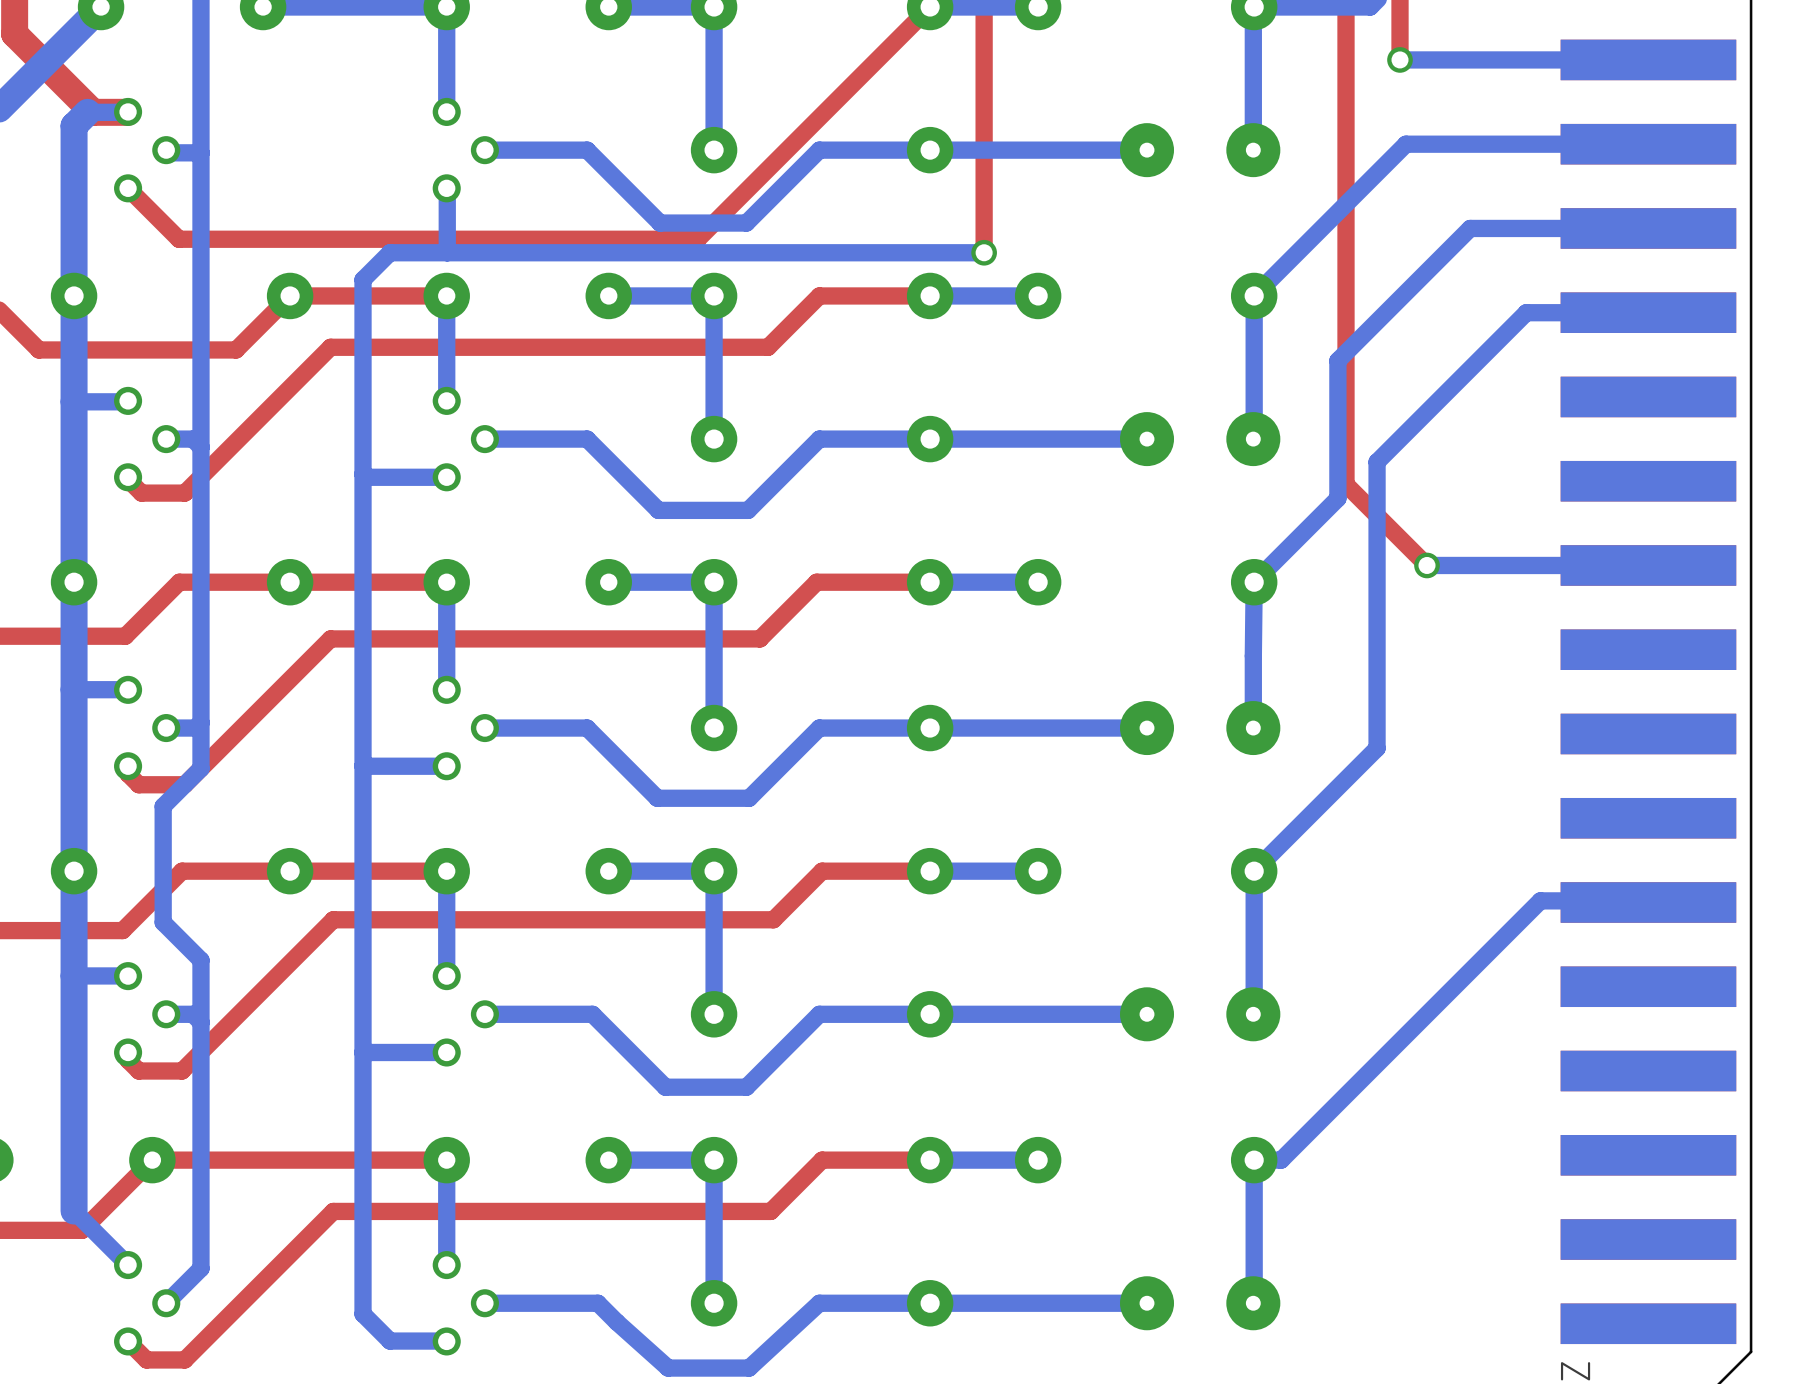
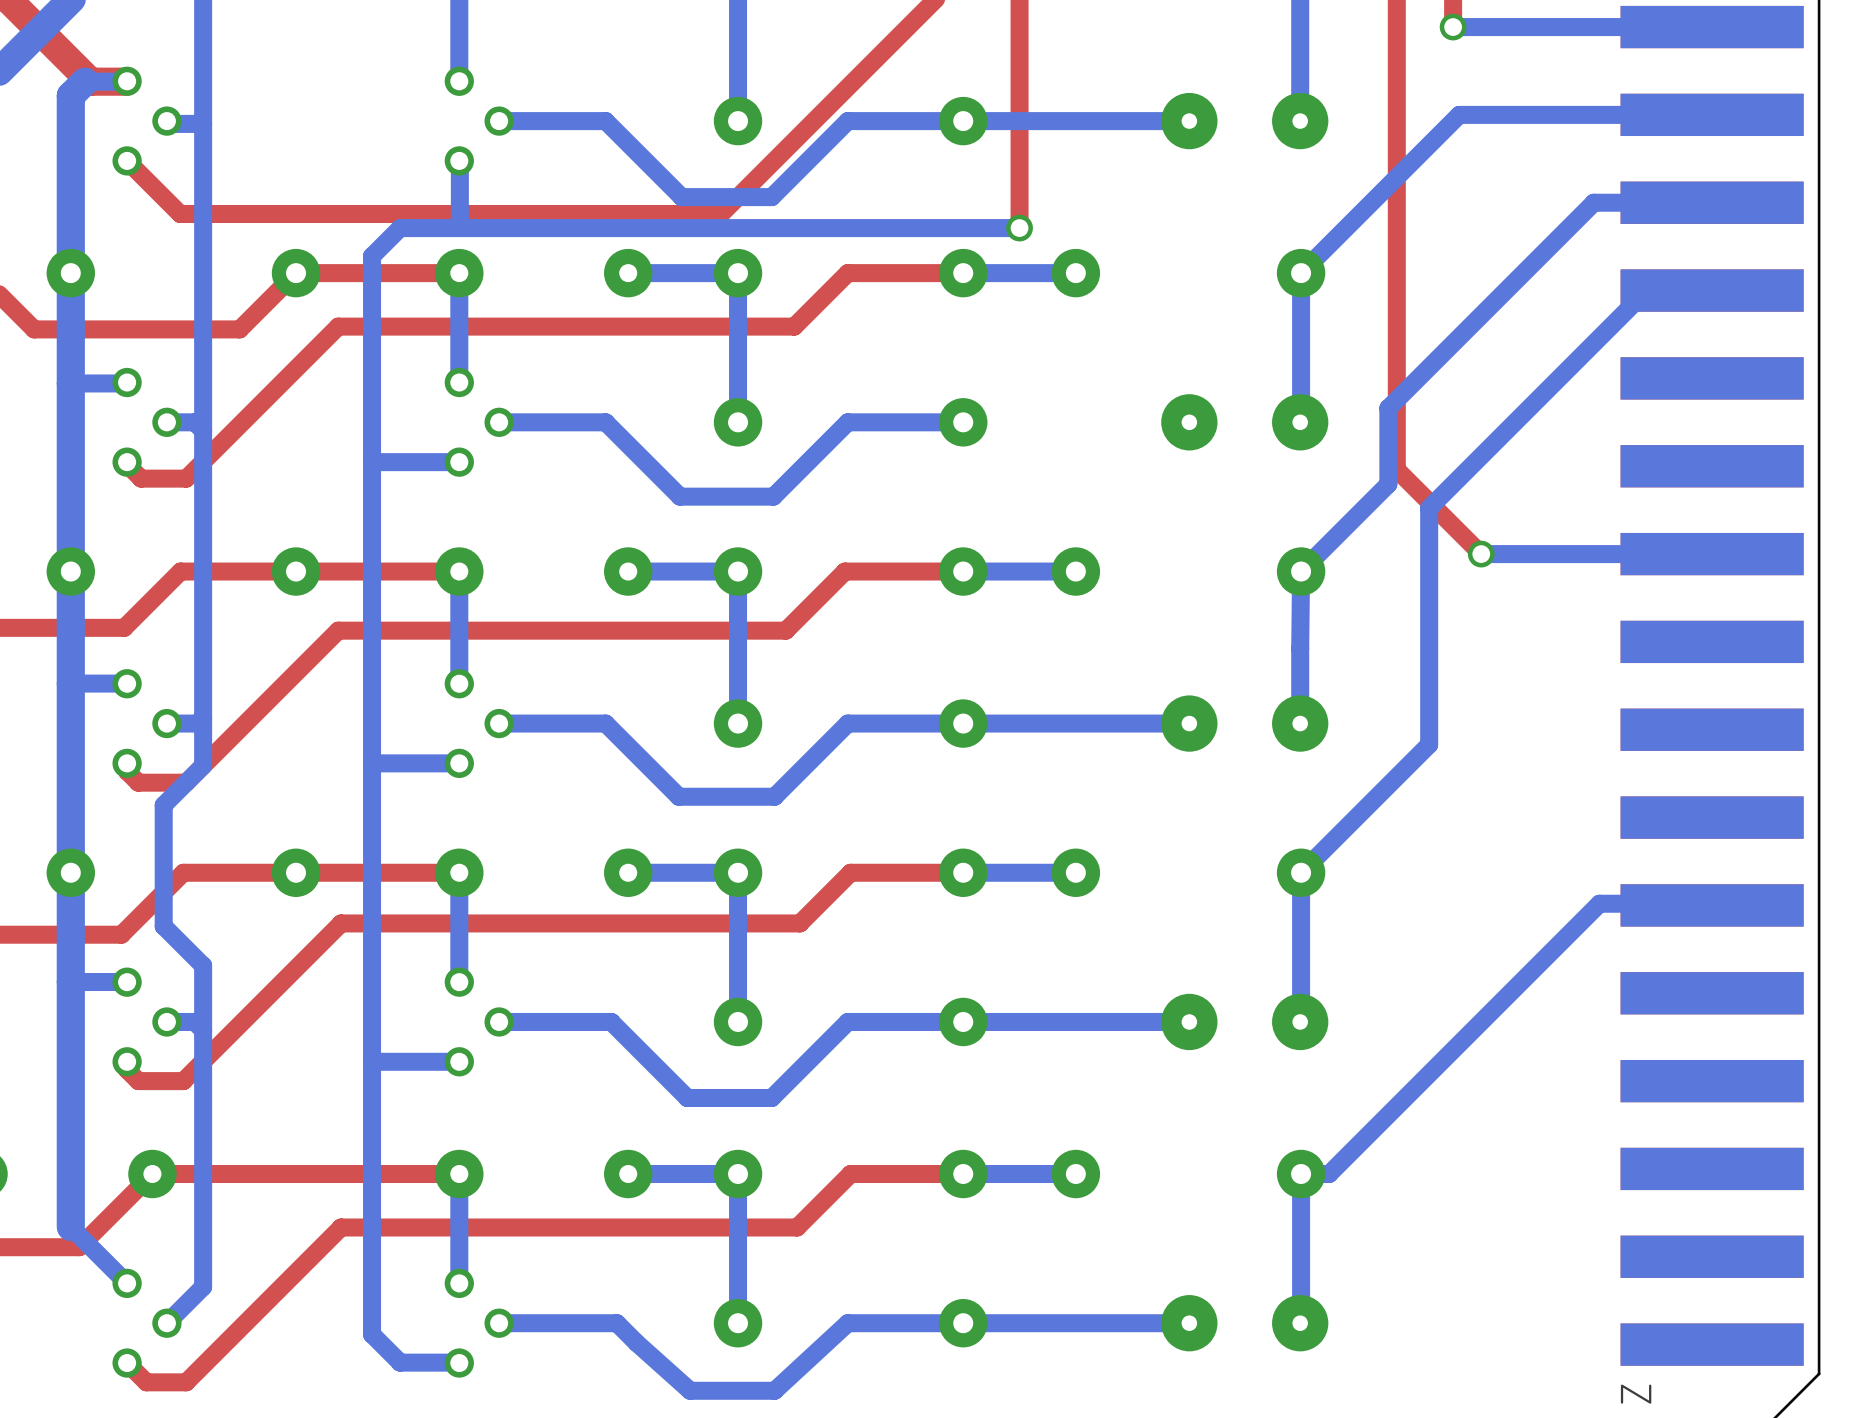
bottom track: (1535, 228) (1470, 228) (1337, 360) (1337, 425) -> (1593, 202) (1388, 408)
bottom track: (1585, 312) (1526, 312) (1377, 462) (1377, 521) -> (1646, 290) (1429, 508)
bottom track: (1147, 439) (930, 439) -> none

